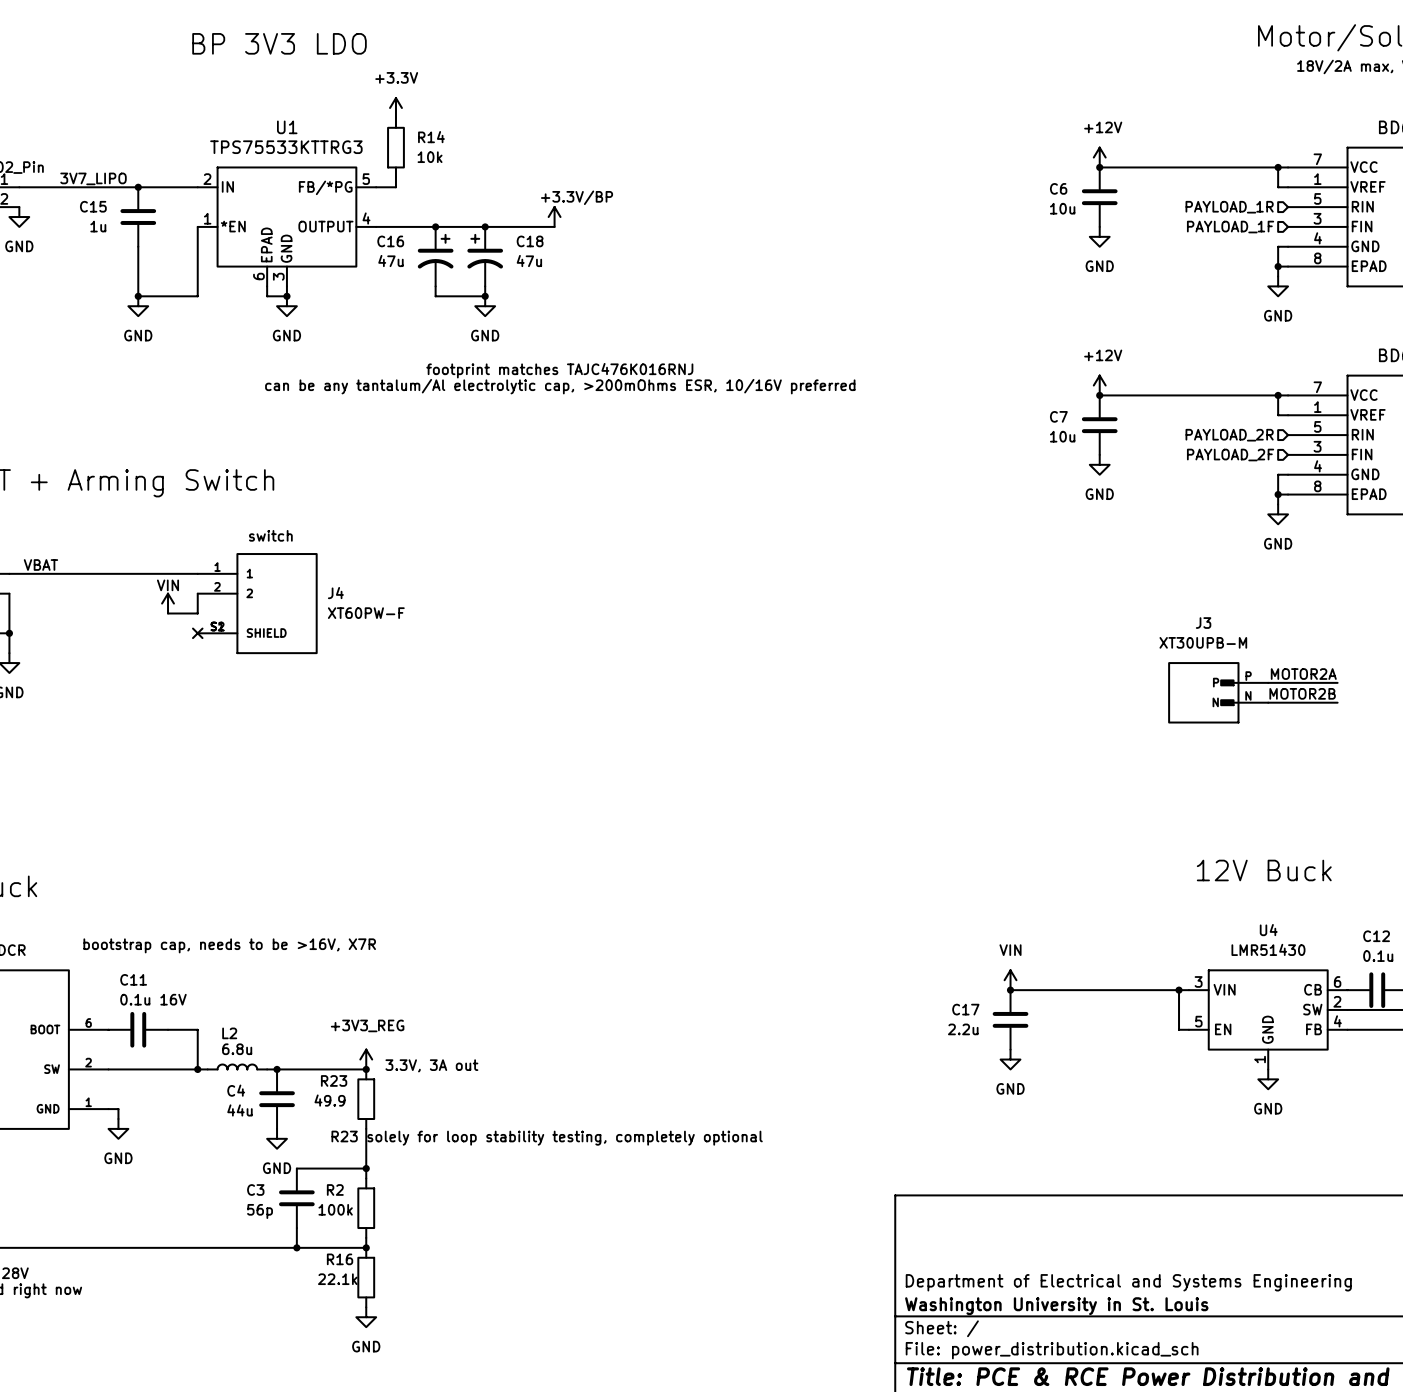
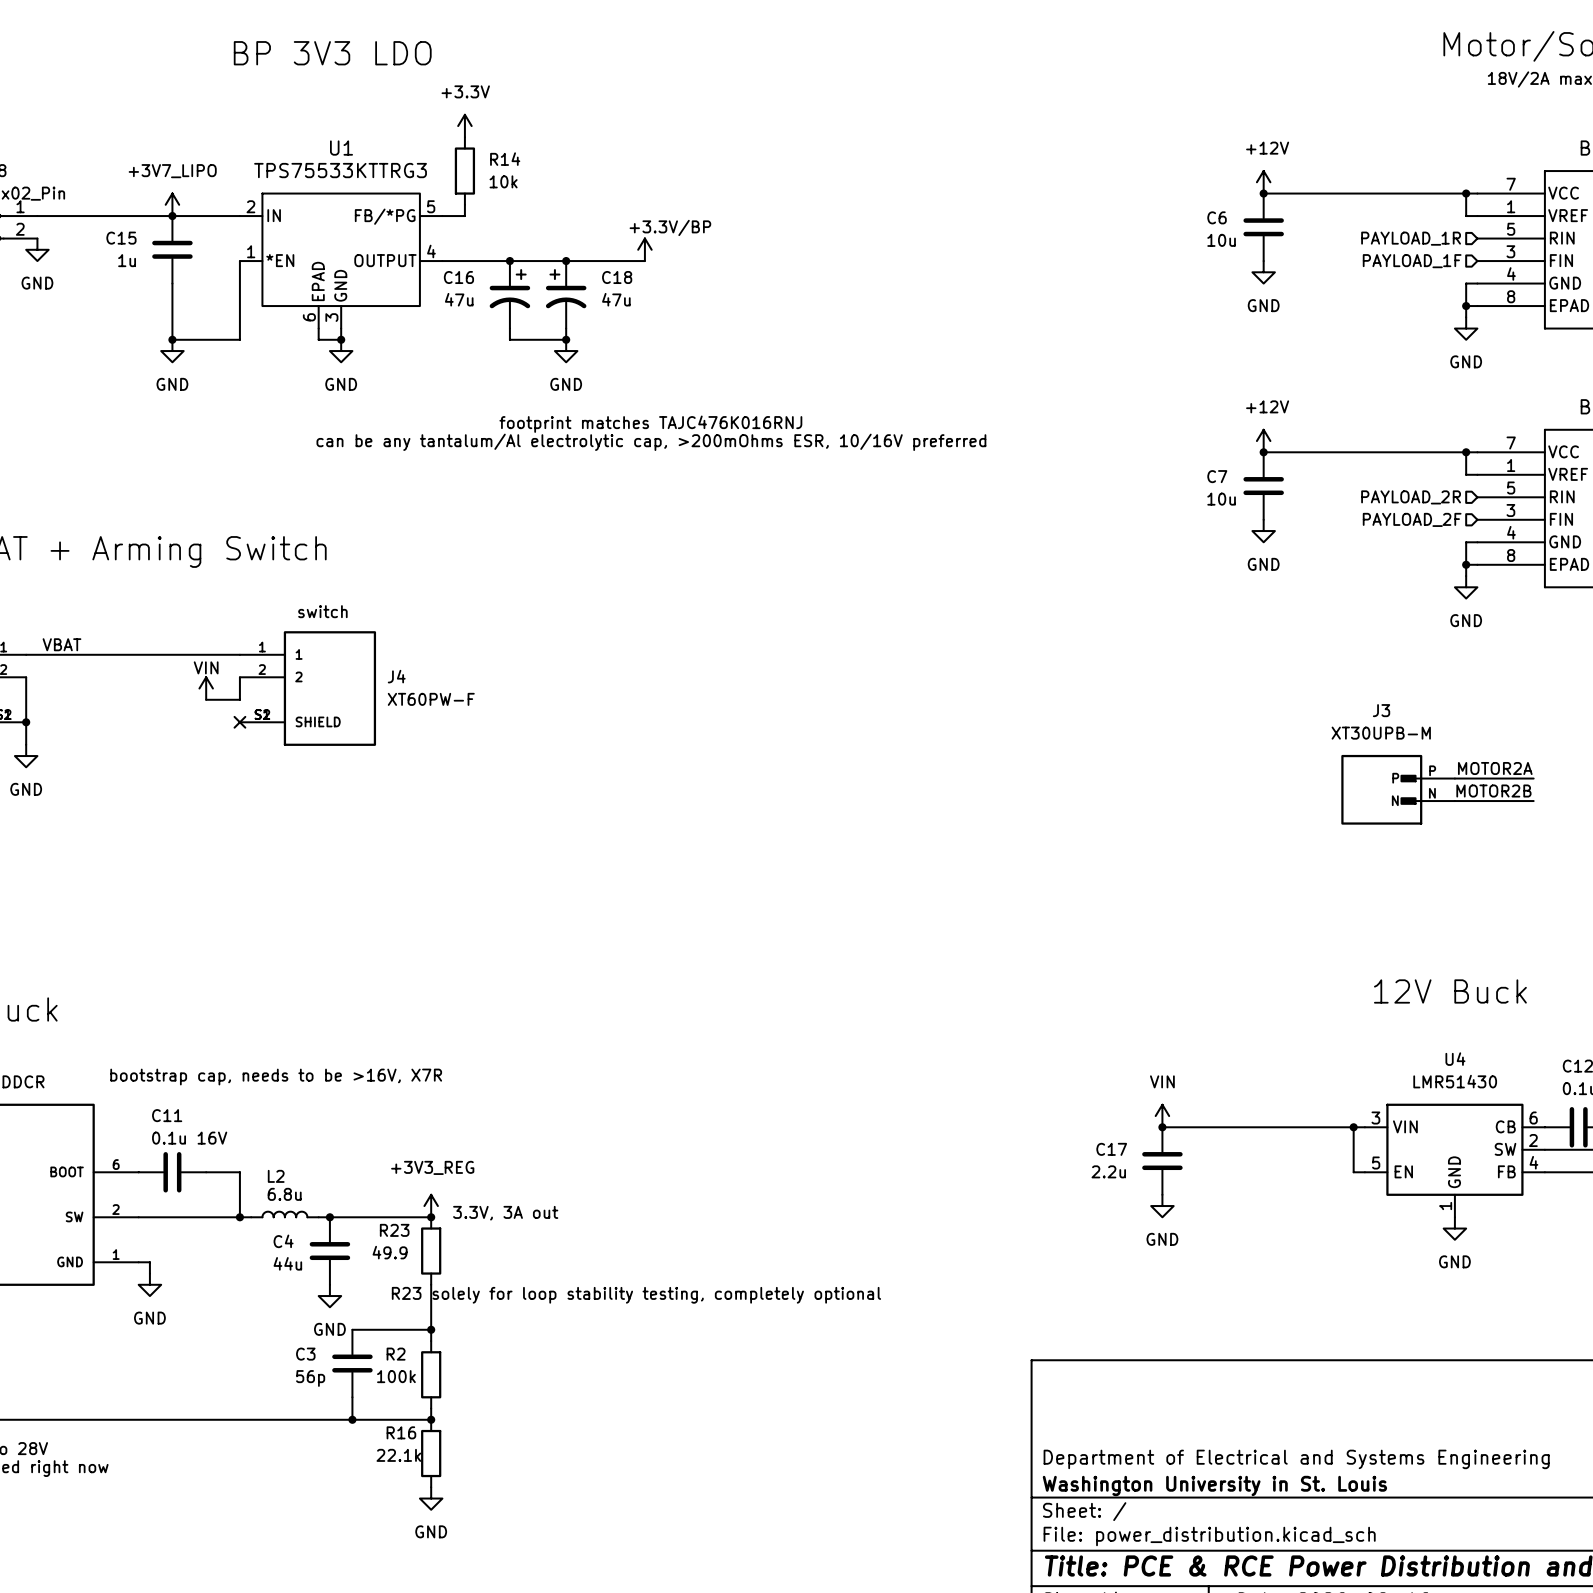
power symbol: none -> +3V7_LIPO (172, 204)
label: 3V7_LIPO (93, 178) -> none

